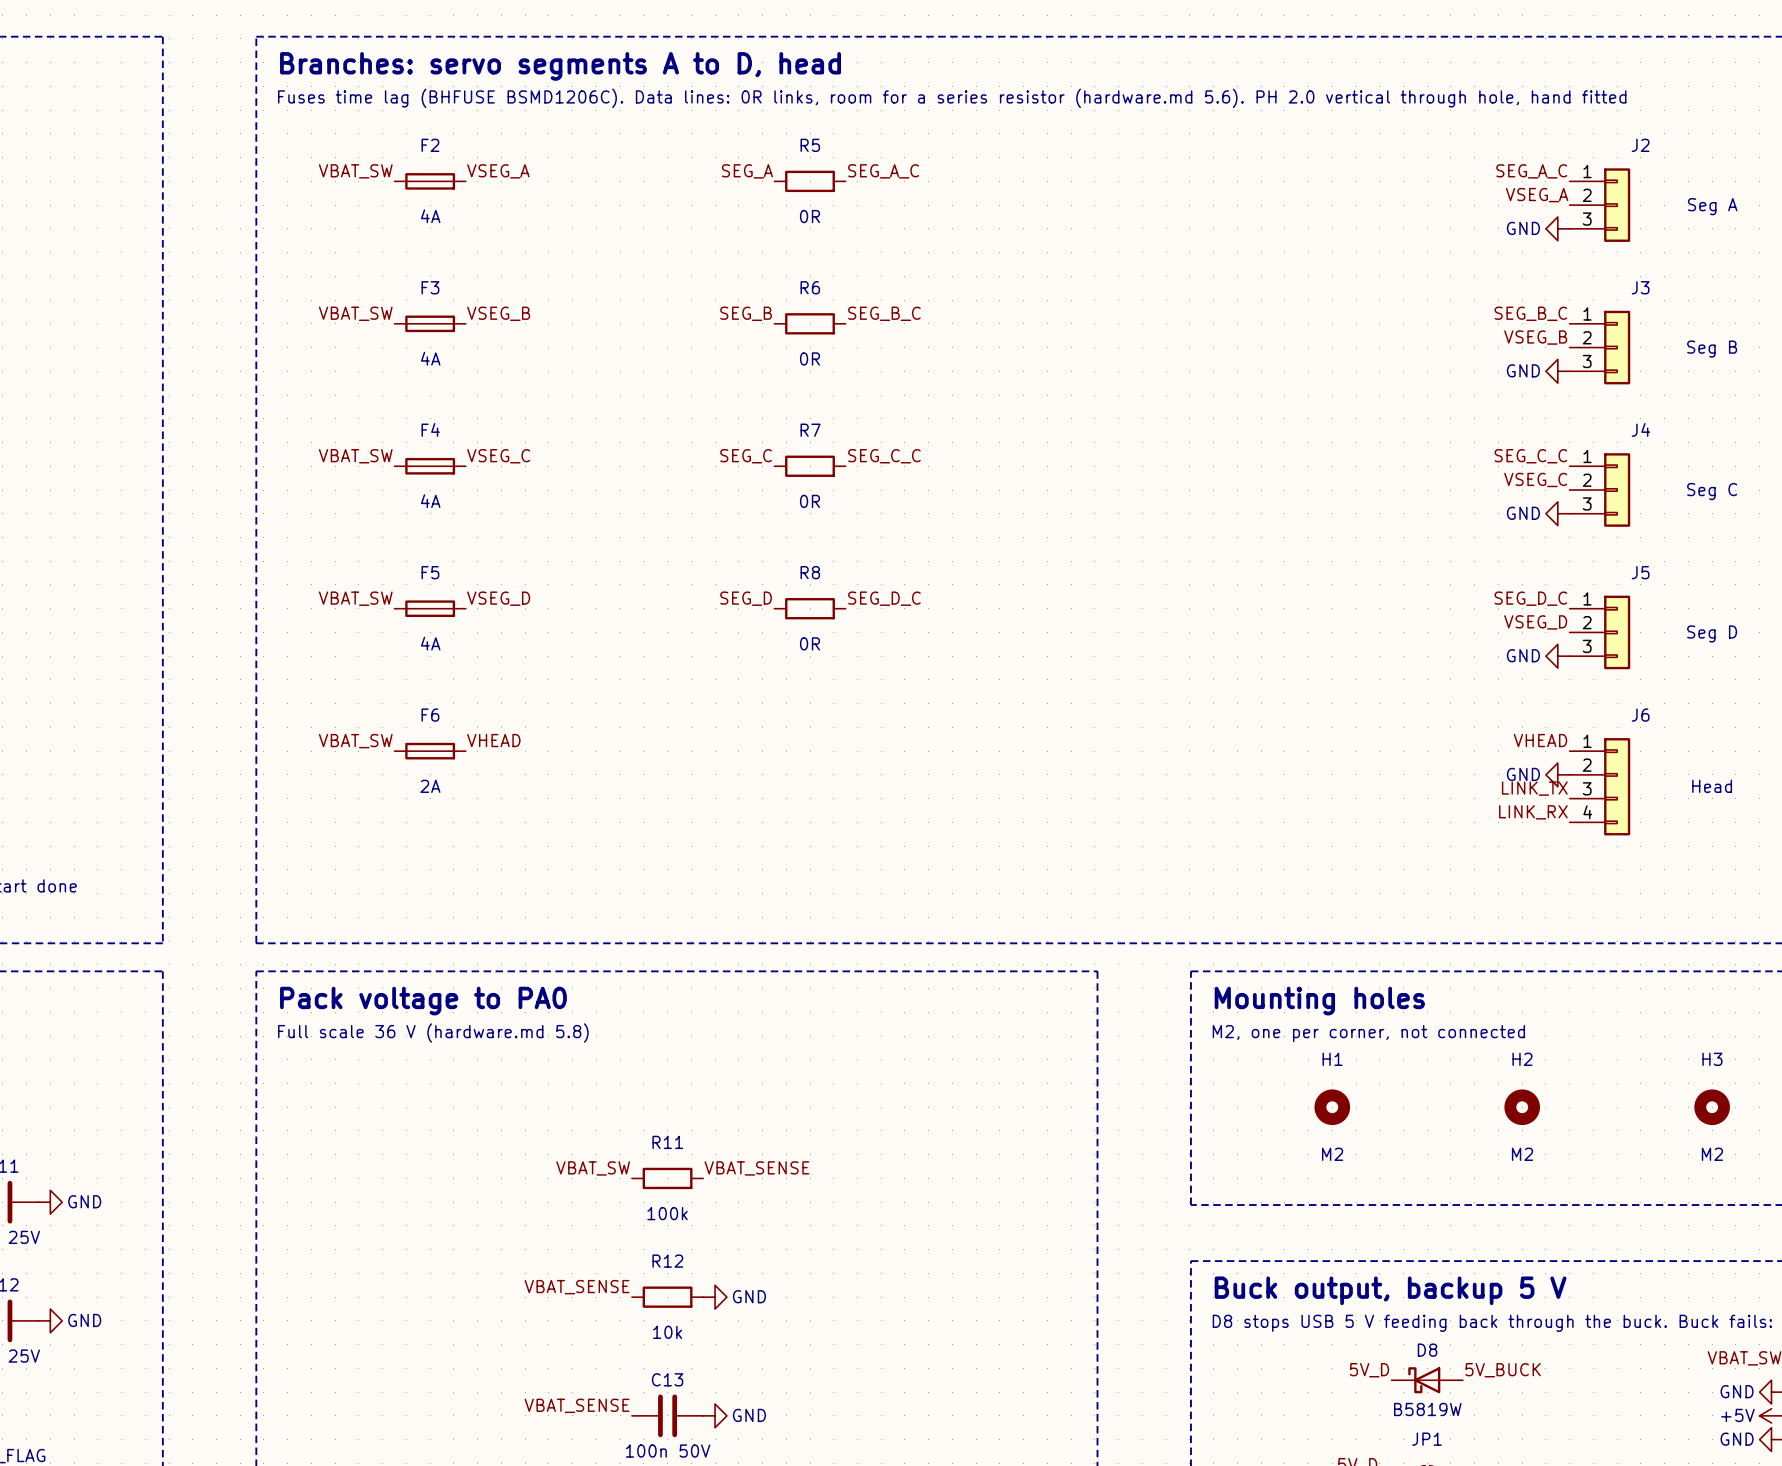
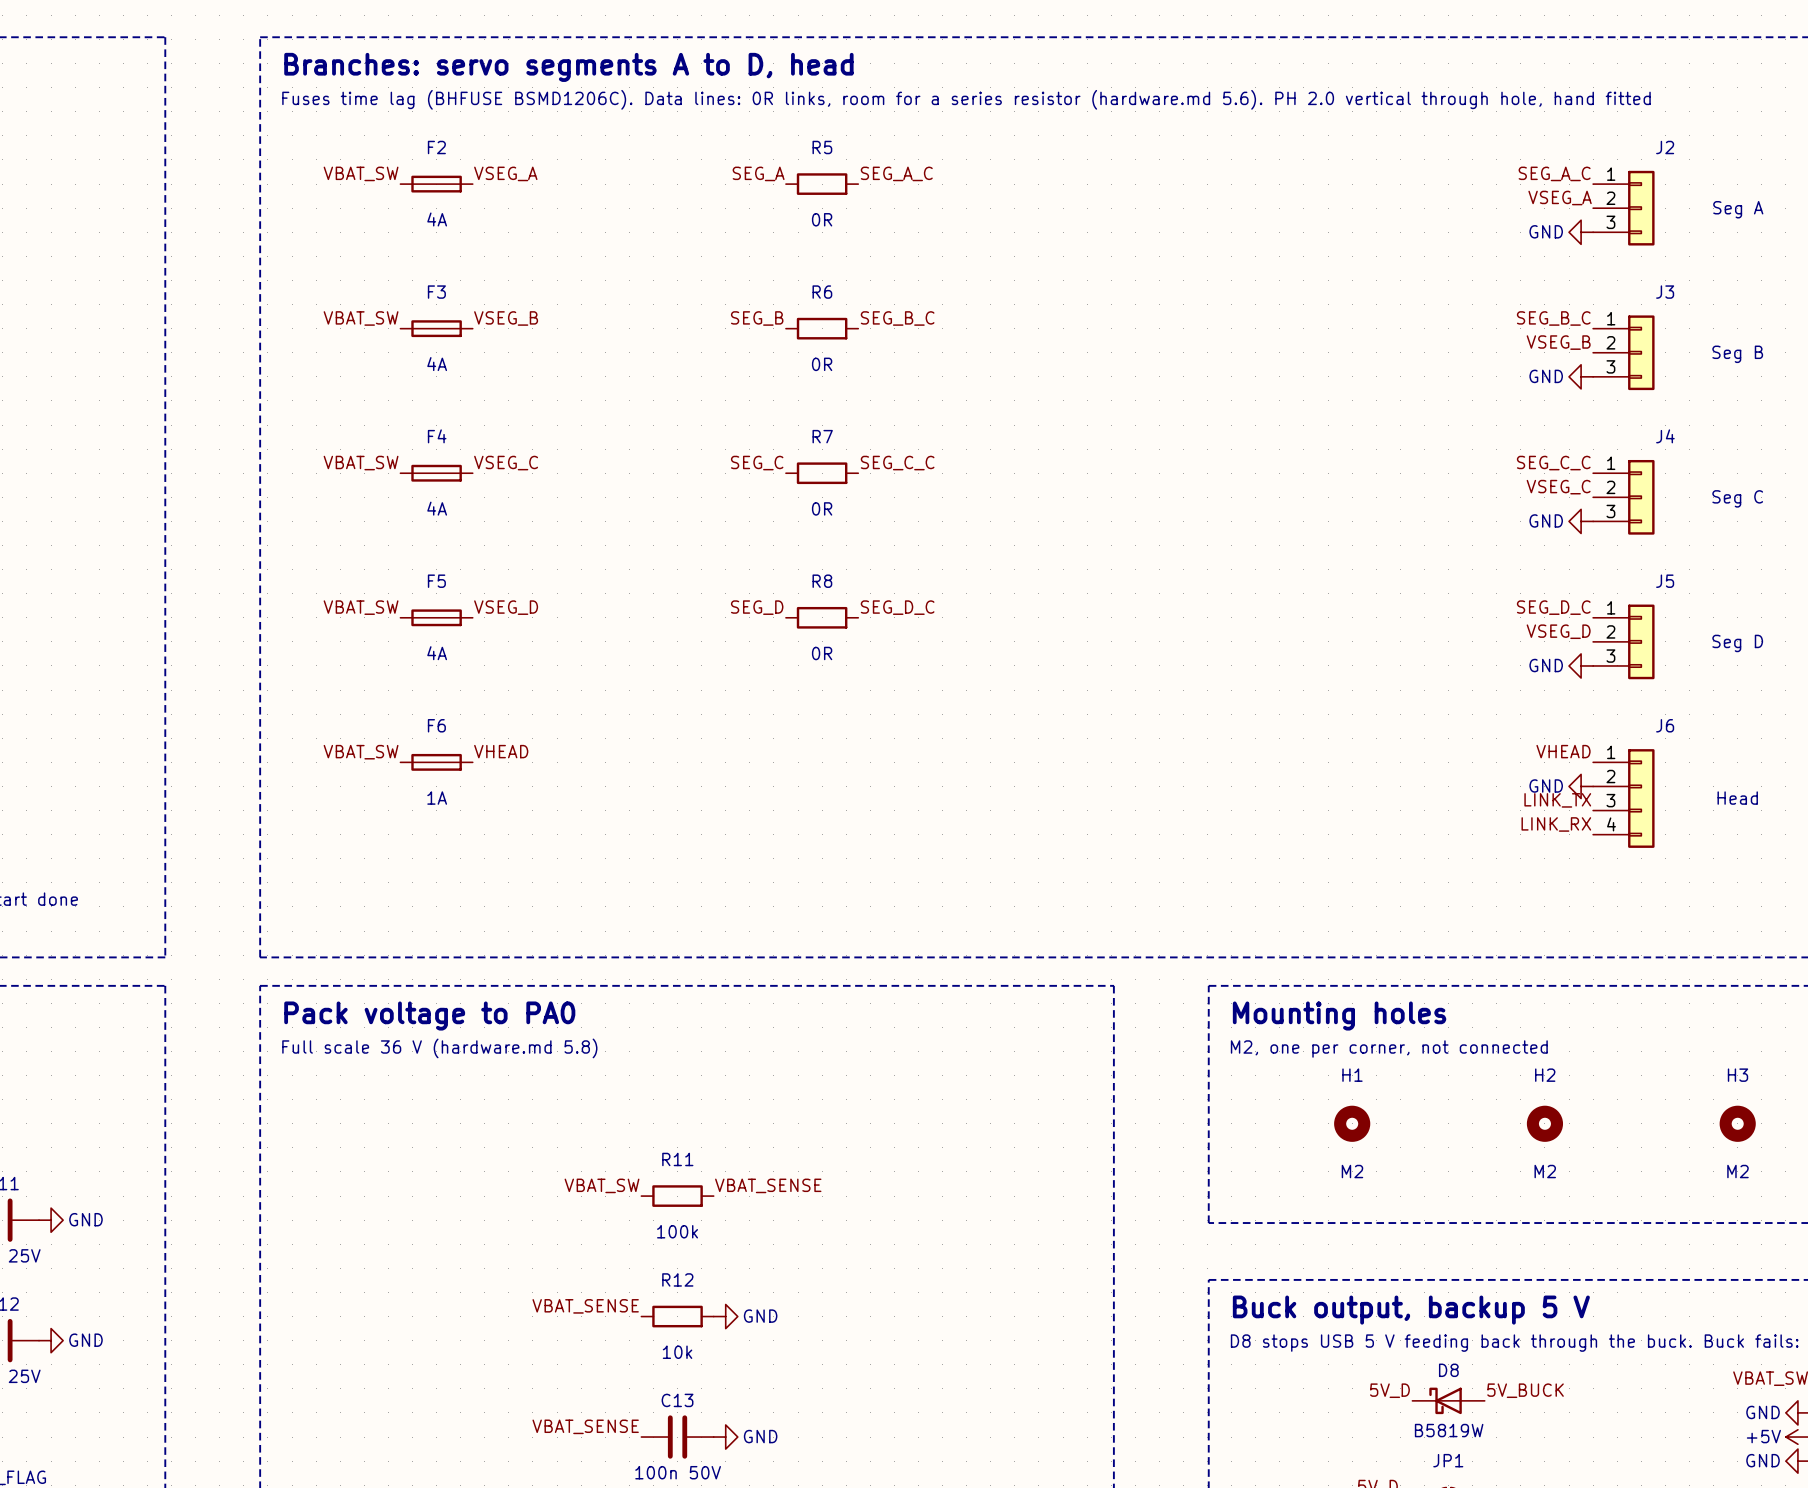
F6 value: 2A (430, 786) -> 1A (437, 798)

